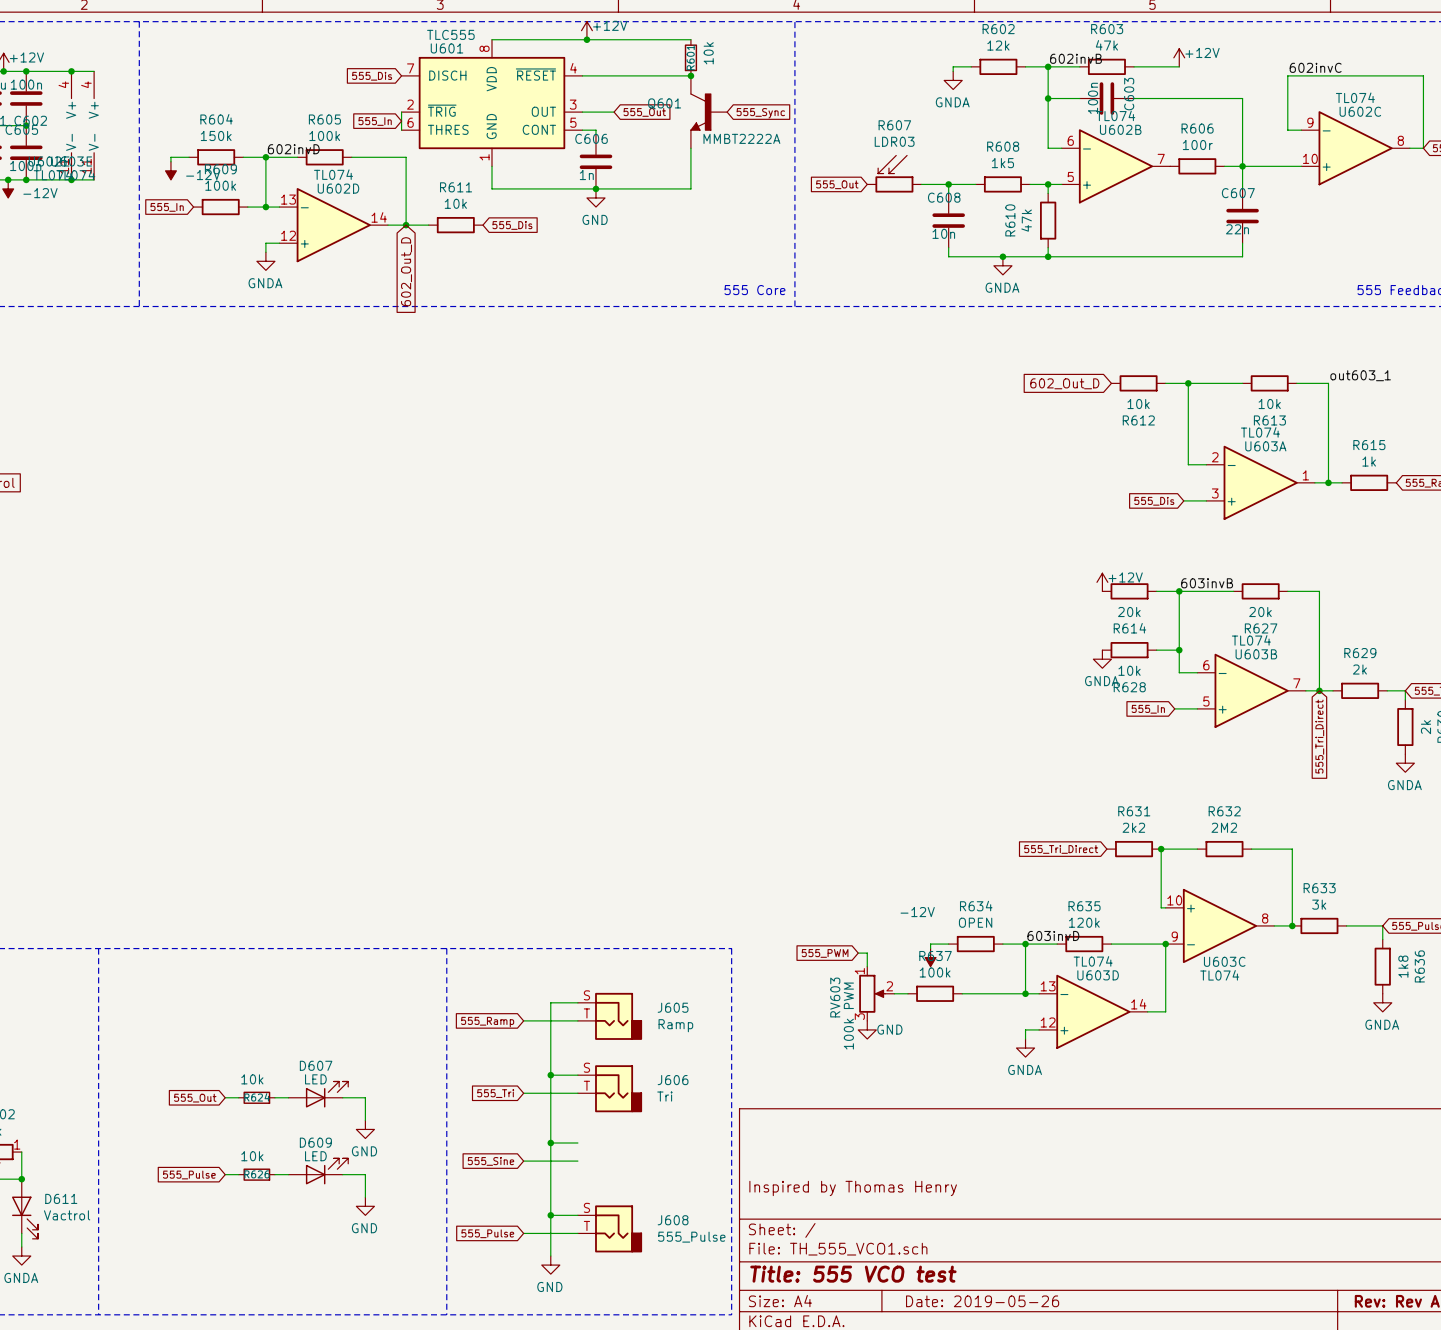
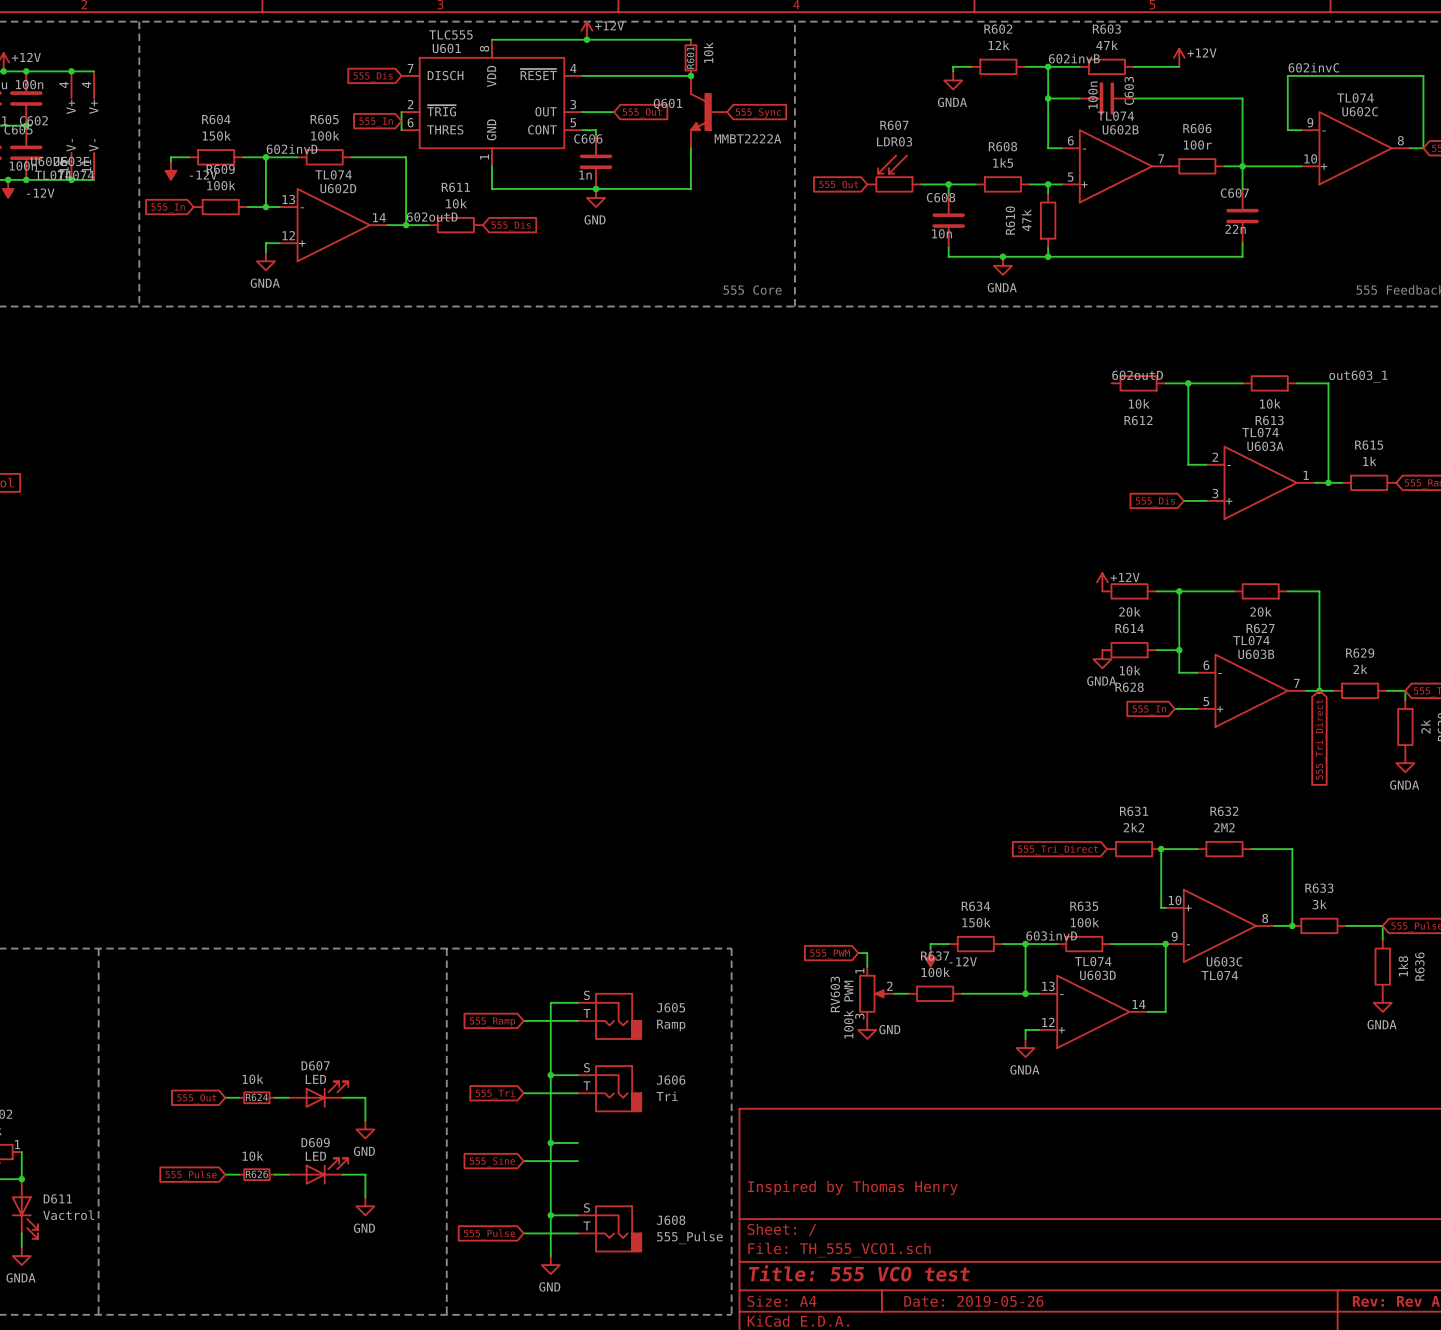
label: none -> 602outD (432, 217)
global label: 602_Out_D (406, 271) -> none
label: none -> 602outD (1137, 375)
global label: 602_Out_D (1064, 383) -> none
label: 603invB (1207, 583) -> none
power symbol text position: -12V (917, 912) -> -12V (963, 961)
R634 value: OPEN (975, 922) -> 150k (976, 922)
R635 value: 120k (1084, 922) -> 100k (1084, 922)

